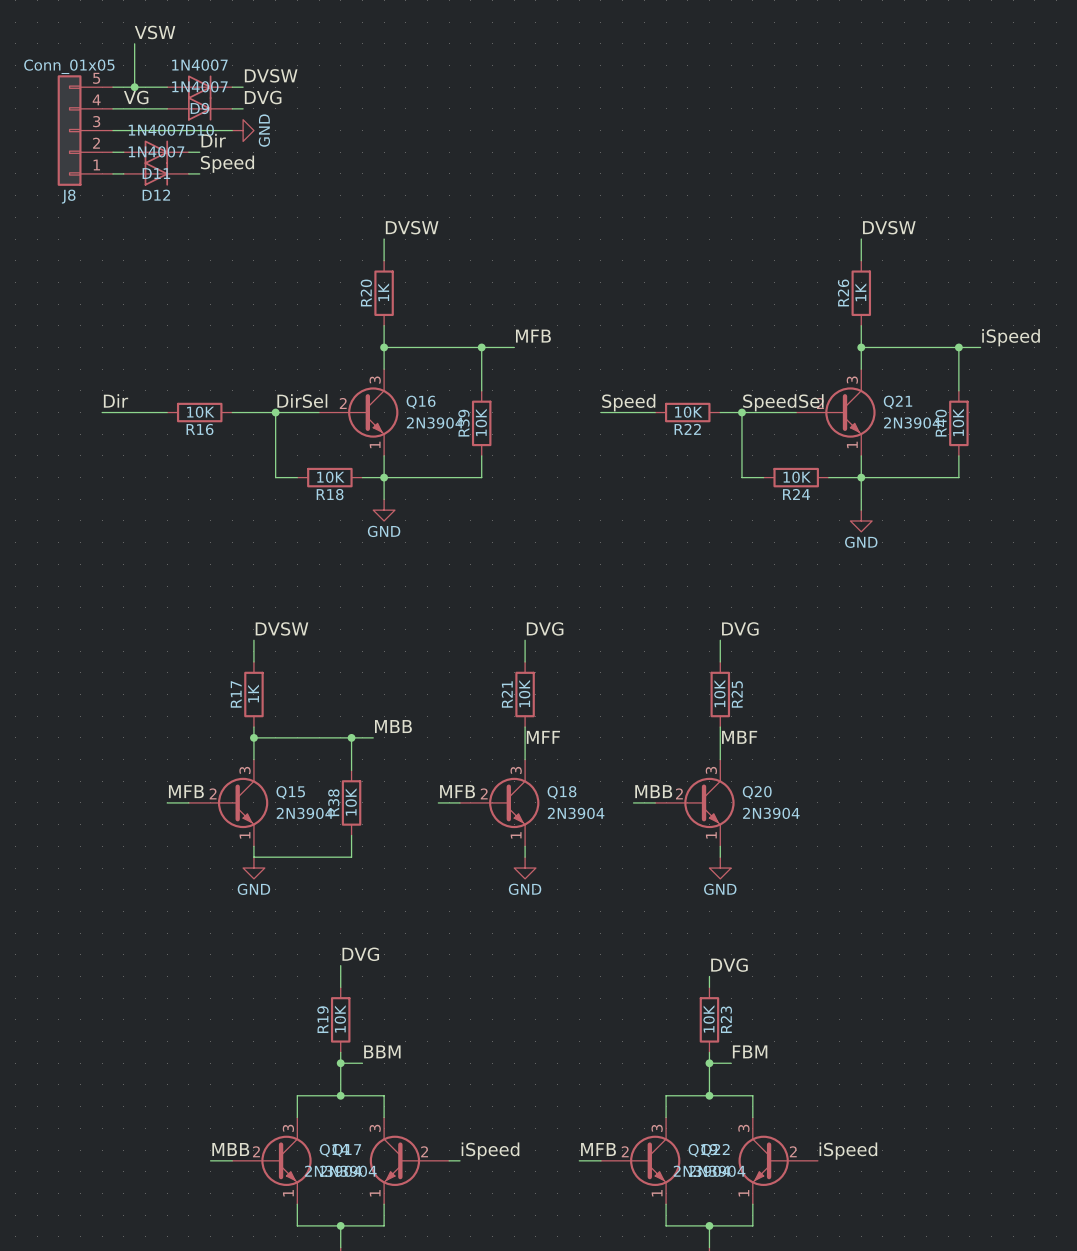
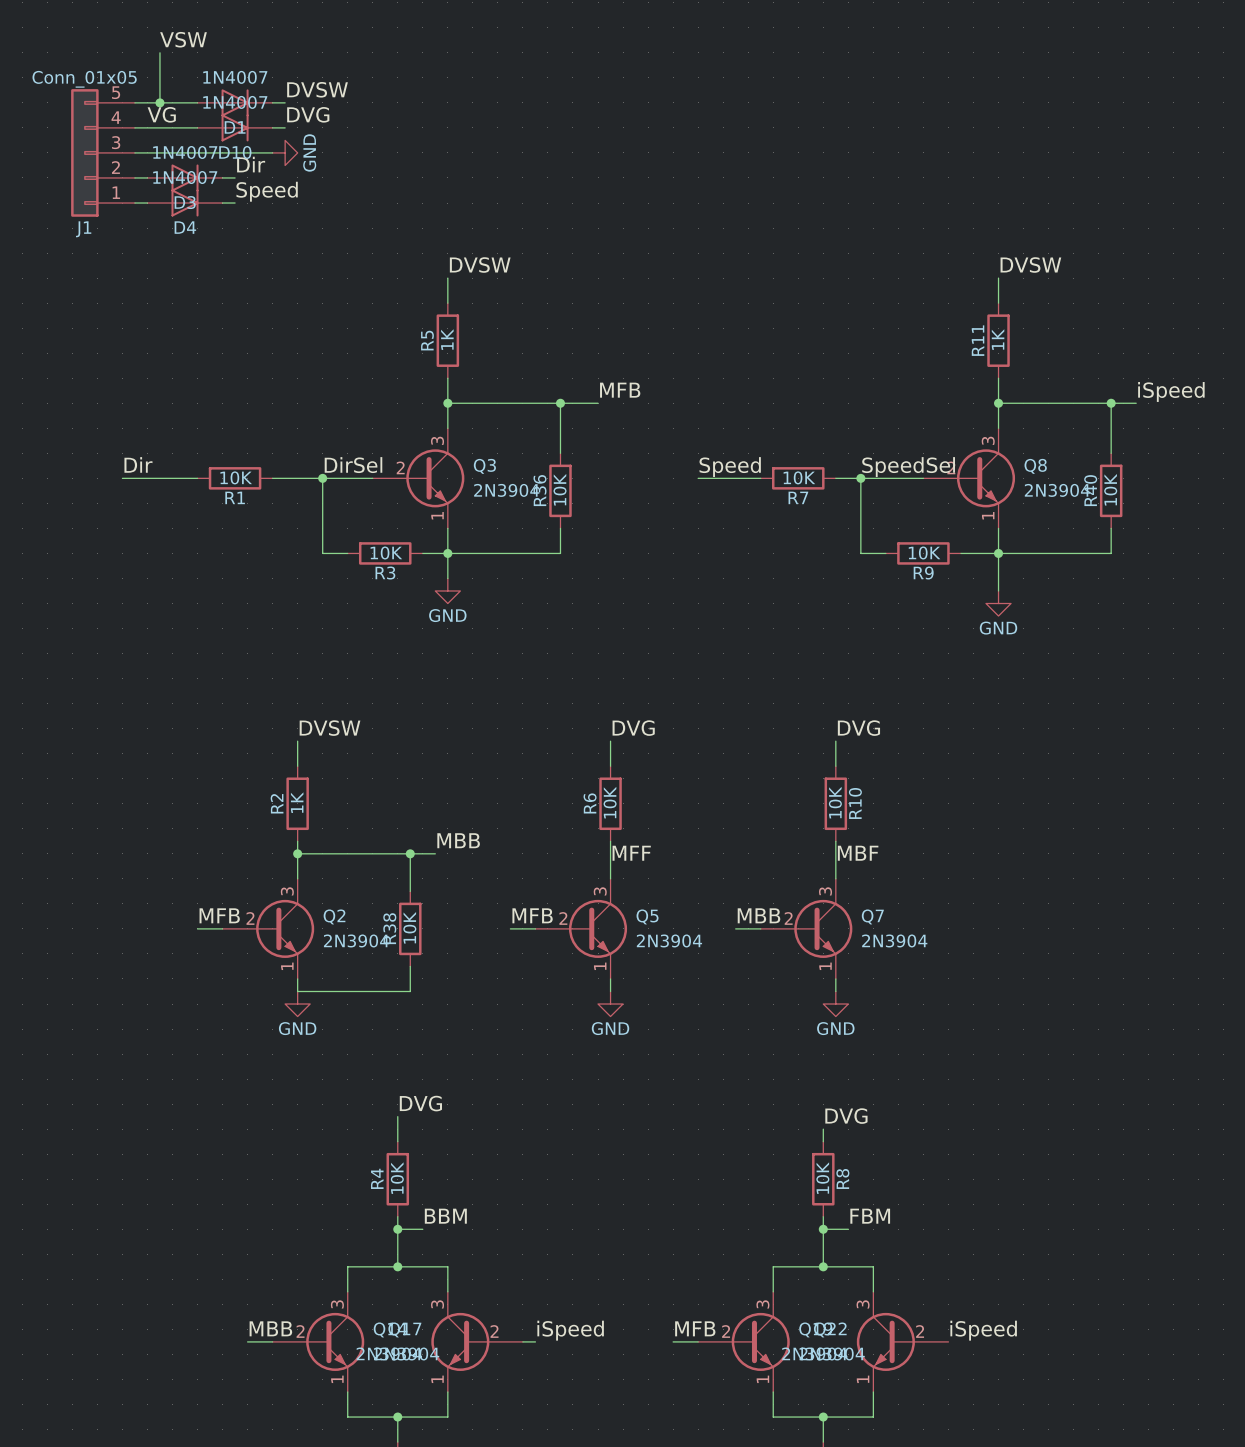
D9 name: D9 (199, 108) -> D1 (235, 127)
D11 name: D11 (156, 173) -> D3 (185, 202)
D12 name: D12 (156, 195) -> D4 (185, 227)
J8 name: J8 (68, 196) -> J1 (83, 229)
R26 name: R26 (843, 292) -> R11 (978, 340)
R20 name: R20 (366, 293) -> R5 (427, 340)
Q16 name: Q16 (421, 402) -> Q3 (484, 466)
Q21 name: Q21 (898, 402) -> Q8 (1035, 466)
R39 name: R39 (463, 423) -> R36 (539, 490)
R16 name: R16 (199, 429) -> R1 (235, 497)
R22 name: R22 (687, 429) -> R7 (798, 497)
R18 name: R18 (330, 494) -> R3 (385, 573)
R24 name: R24 (796, 494) -> R9 (923, 573)
R17 name: R17 (236, 694) -> R2 (277, 803)
R21 name: R21 (507, 694) -> R6 (590, 803)
R25 name: R25 (737, 694) -> R10 (855, 803)
Q15 name: Q15 (290, 792) -> Q2 (334, 916)
Q18 name: Q18 (561, 792) -> Q5 (647, 916)
Q20 name: Q20 (757, 792) -> Q7 (872, 916)
R19 name: R19 (322, 1019) -> R4 (377, 1178)
R23 name: R23 (726, 1019) -> R8 (842, 1178)

